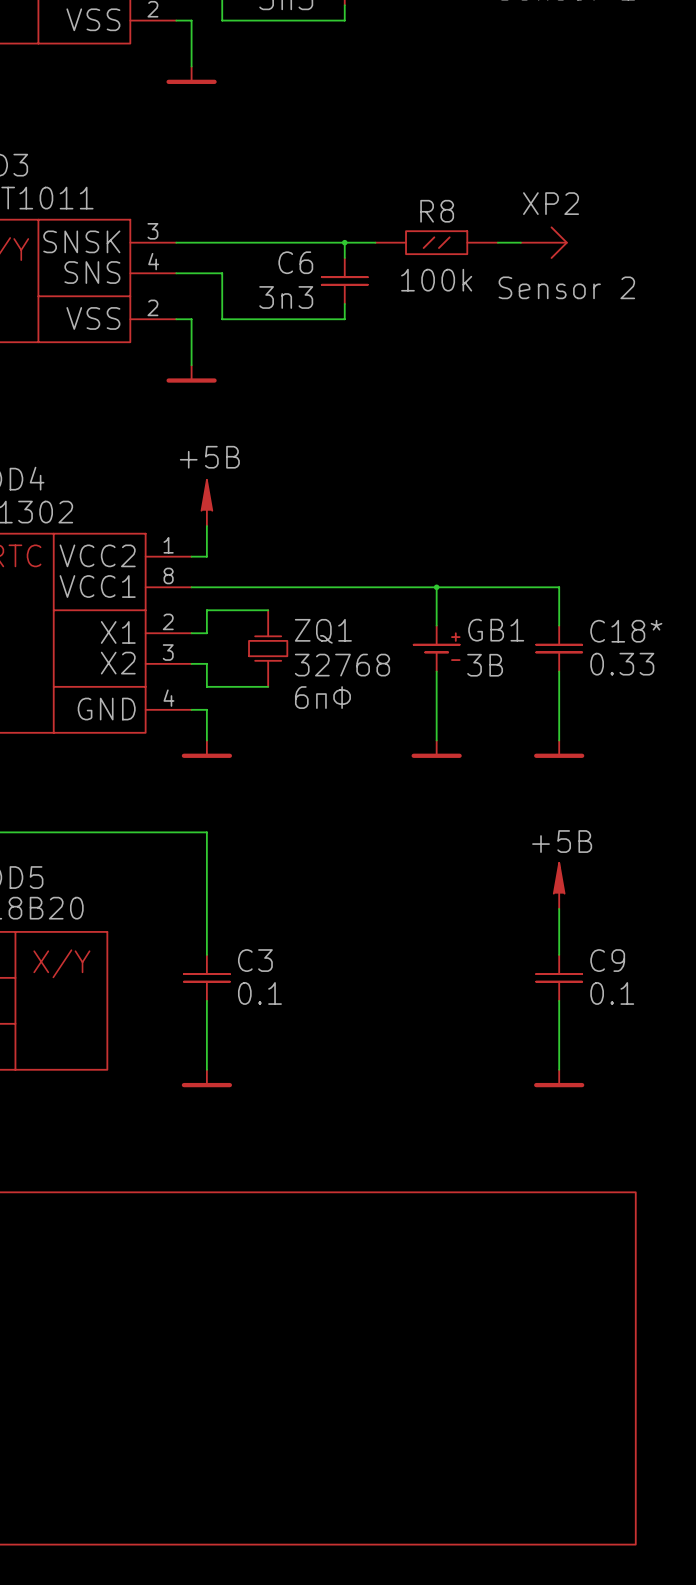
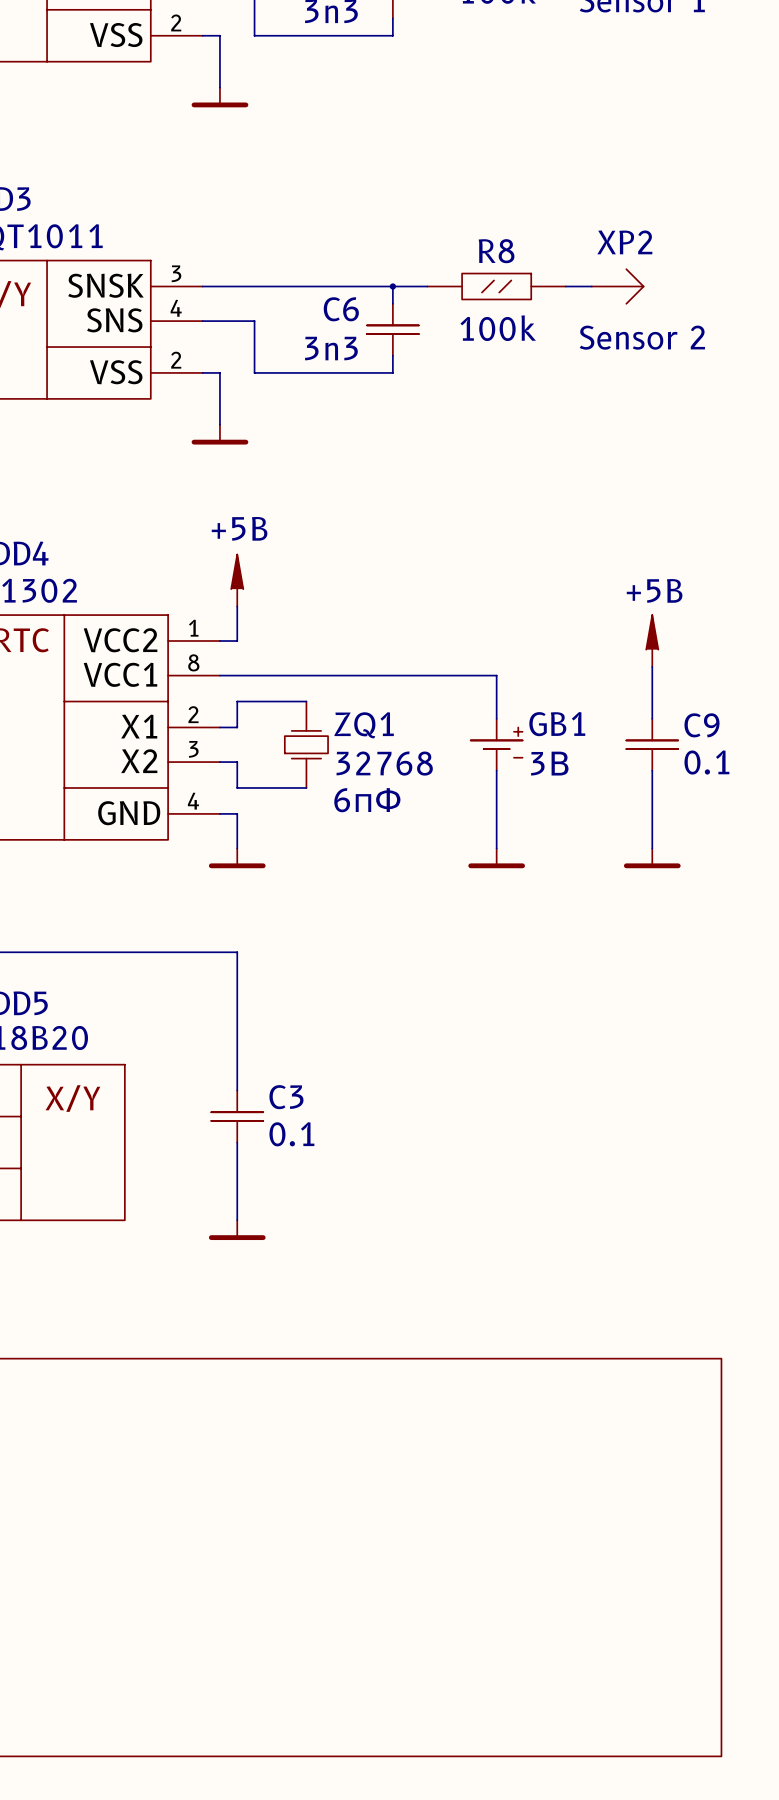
power symbol: none -> +5B (652, 641)
wire: none -> (652, 666) (652, 718)
wire: (436, 587) (559, 587) (559, 625) -> none
junction: (436, 587) -> none
C18*: 0.33 (559, 648) -> none
wire: (559, 671) (559, 740) -> (652, 770) (652, 848)
power symbol position: (559, 749) -> (652, 858)
power symbol: +5B (559, 885) -> none
wire: (559, 908) (559, 954) -> none
C9 position: (559, 977) -> (652, 744)
wire: (559, 1000) (559, 1069) -> none
power symbol: (559, 1078) -> none

